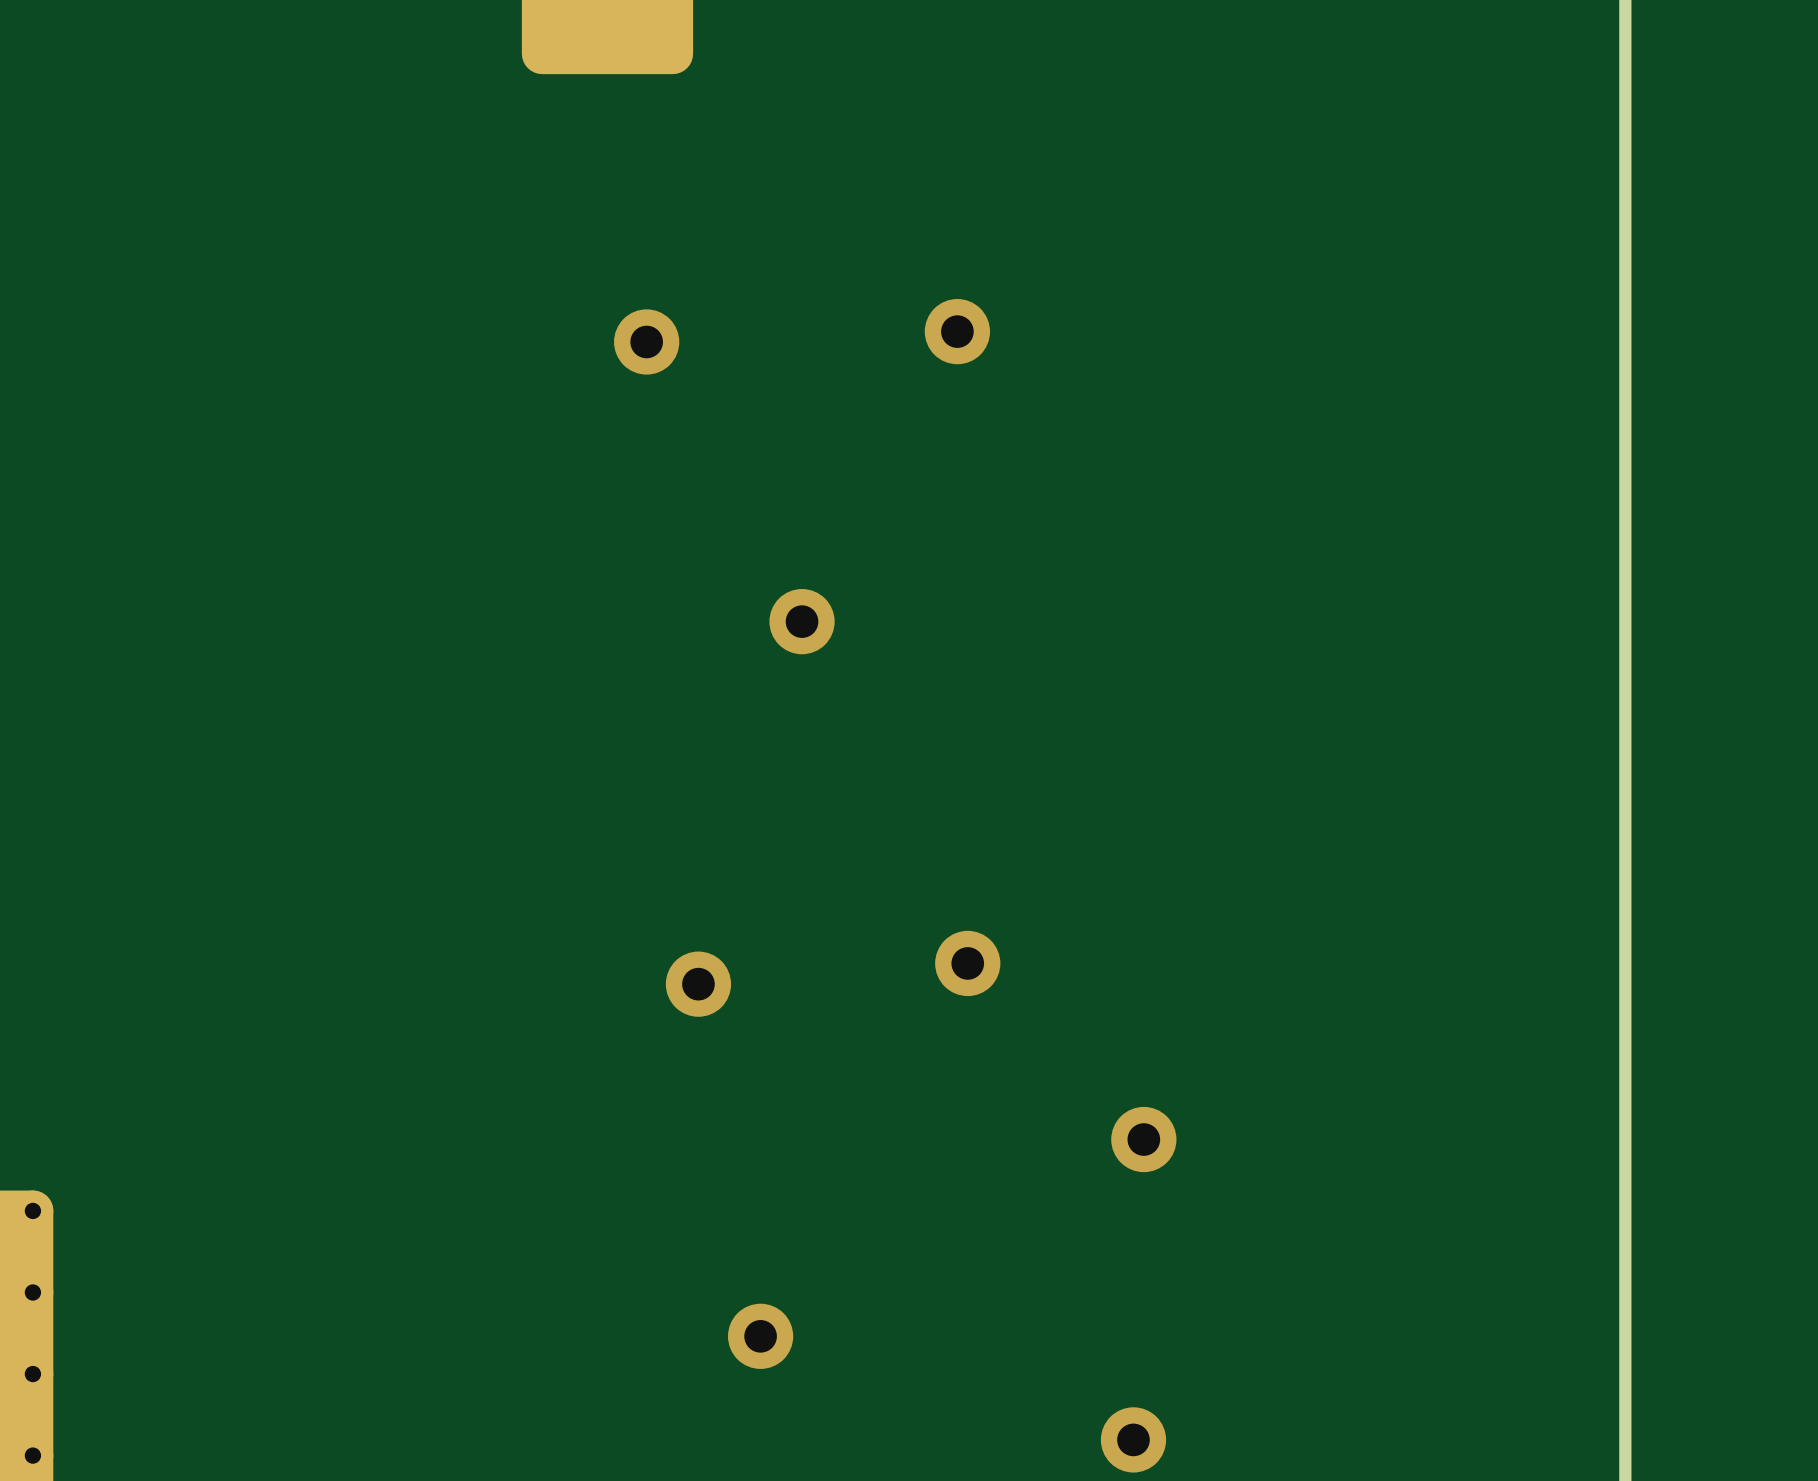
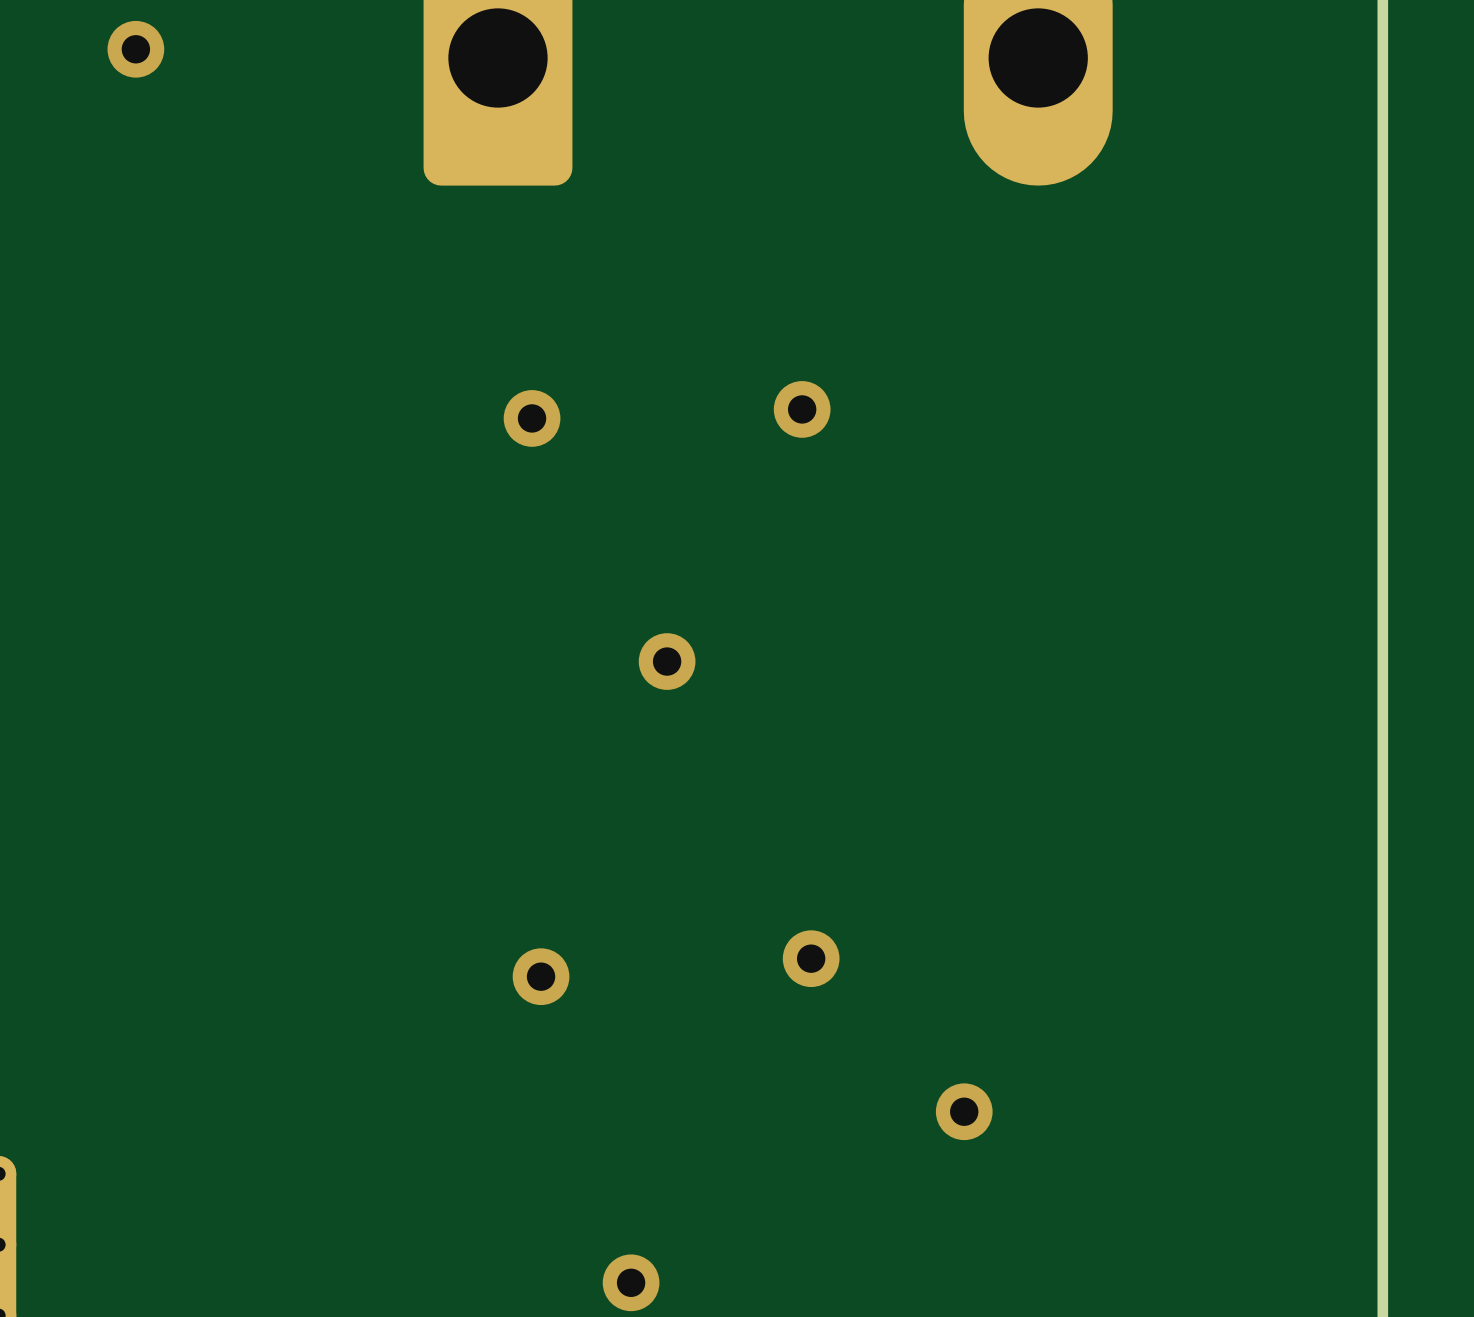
via position: (698, 984) -> (541, 976)

